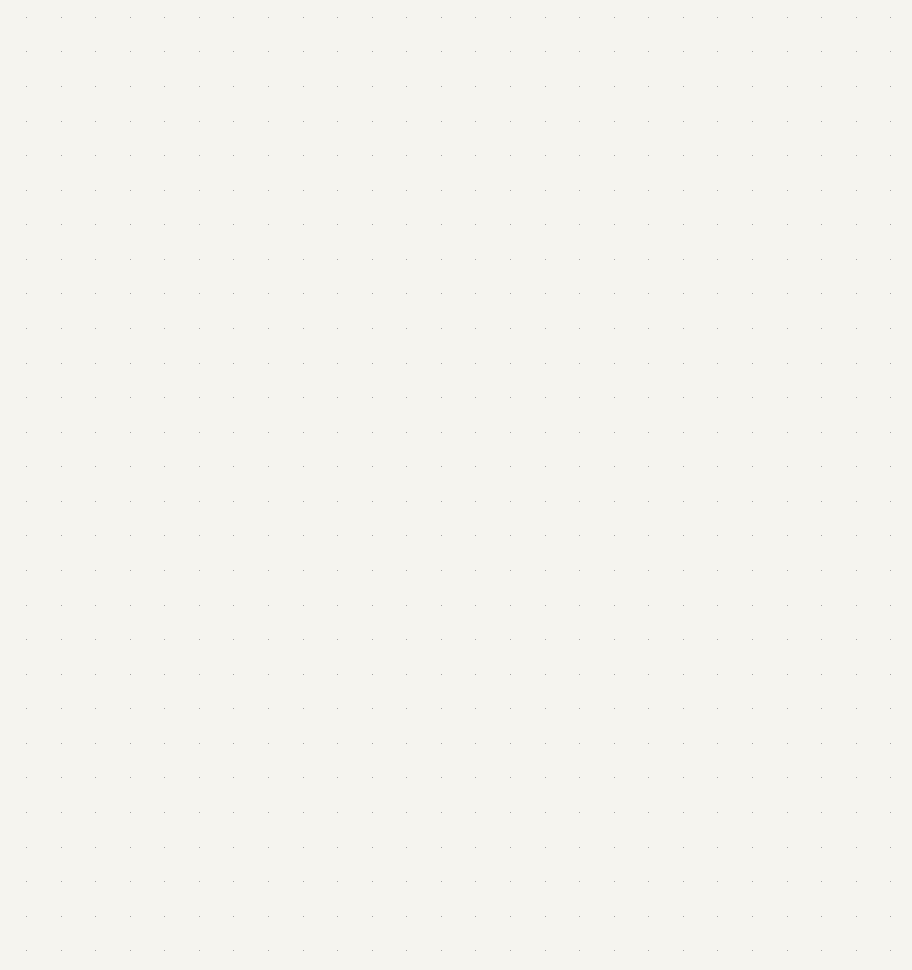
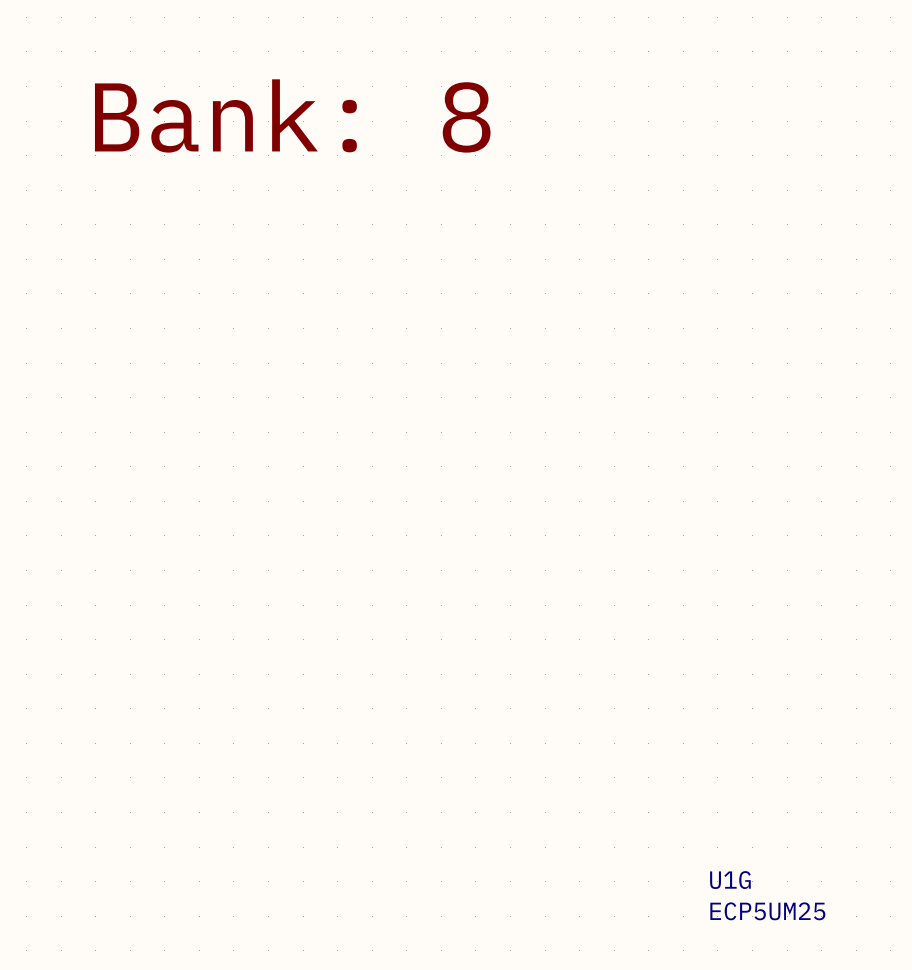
U1G: none -> ECP5UM25 (460, 499)

